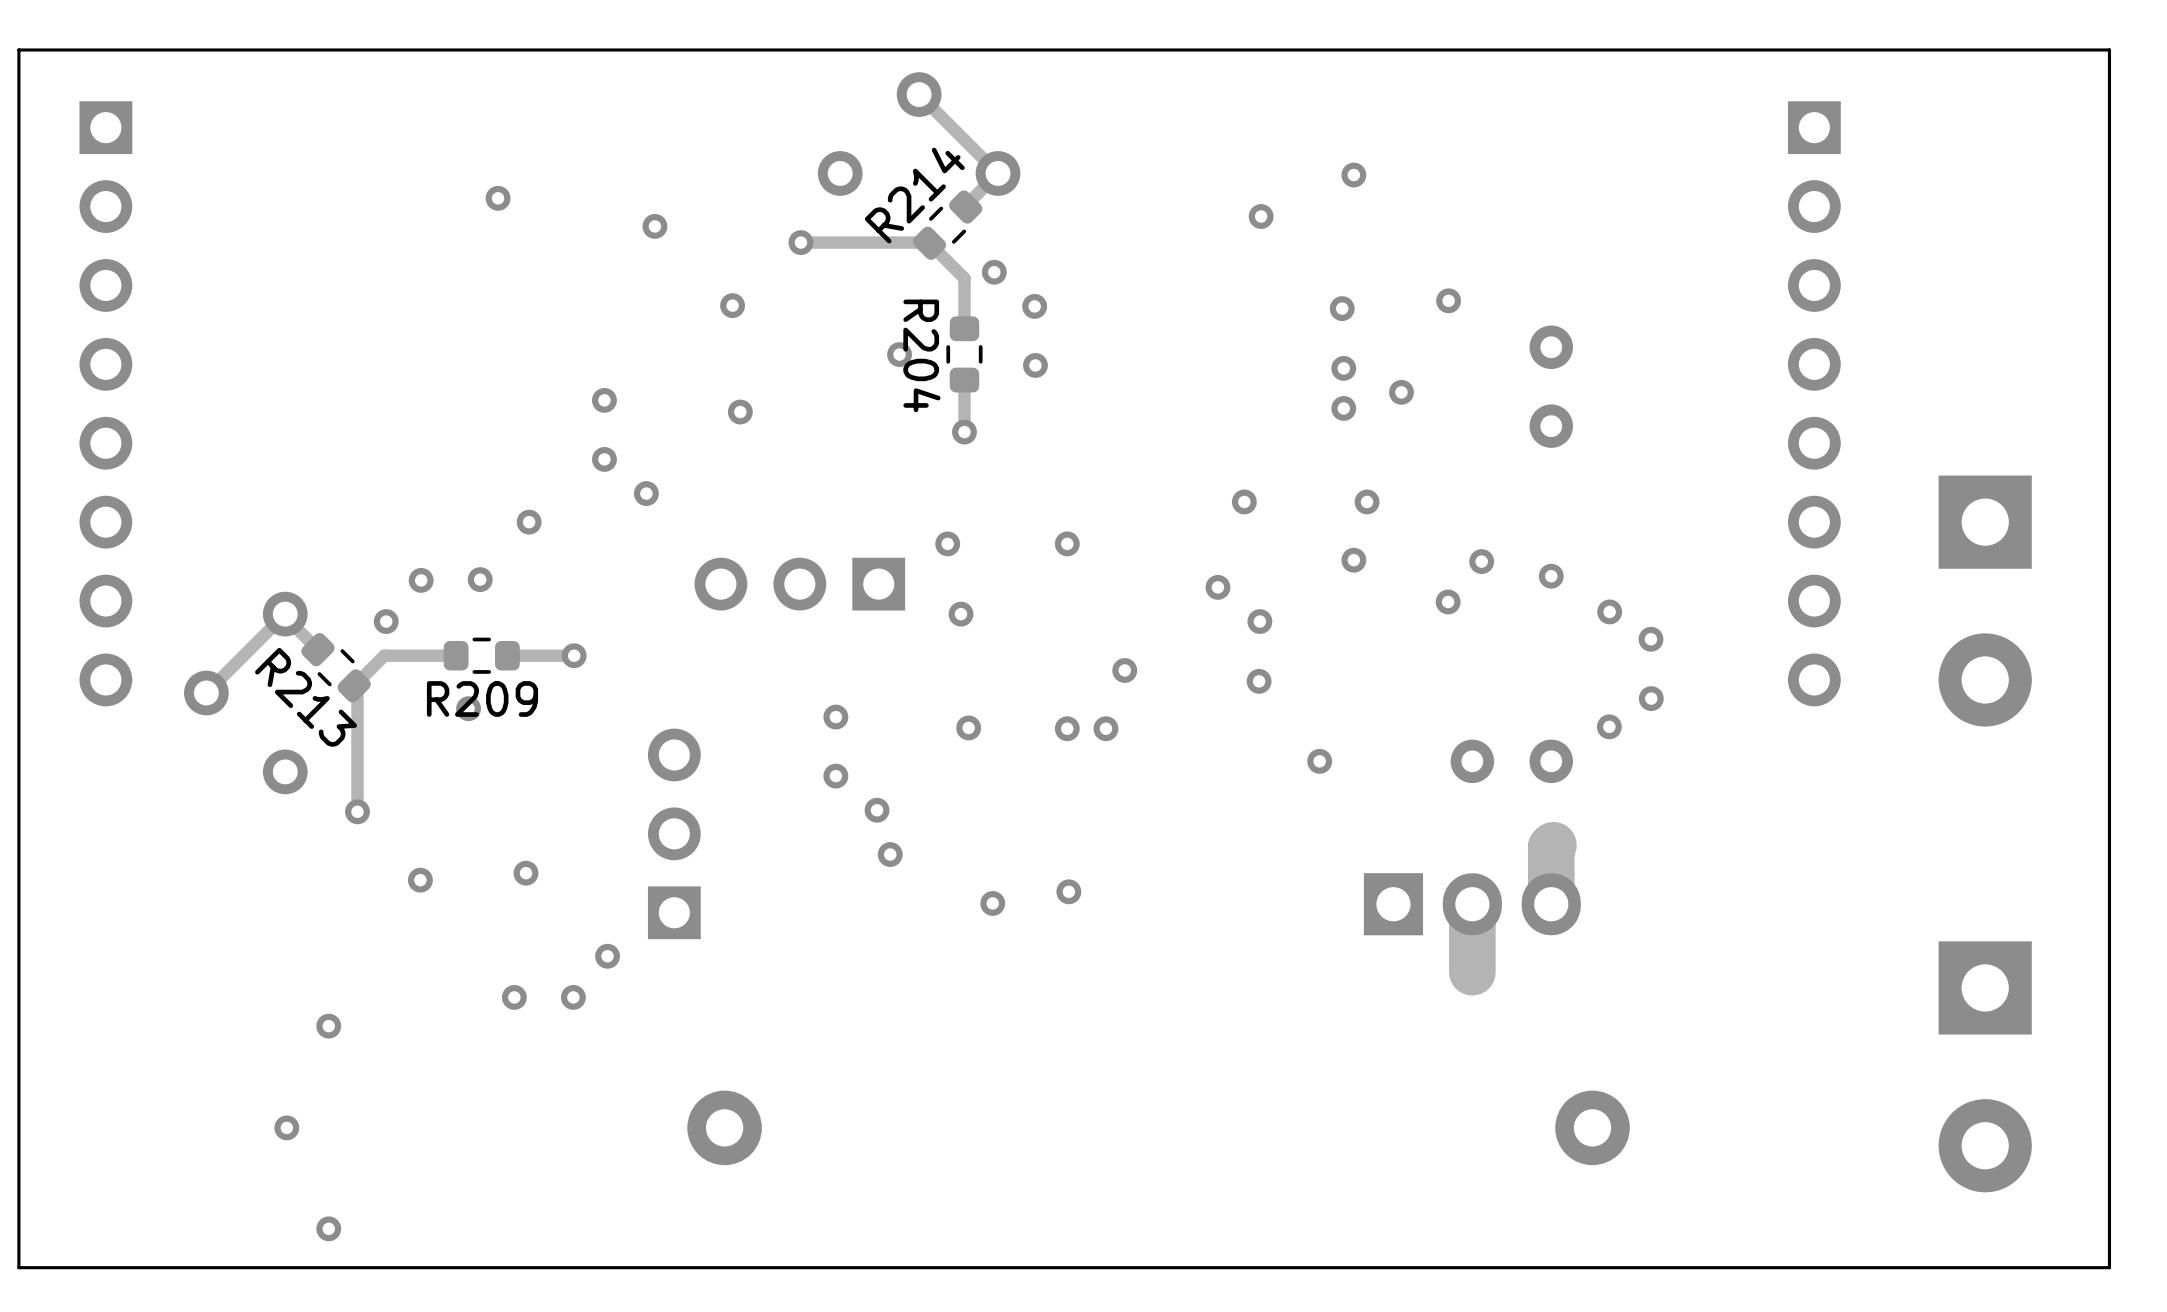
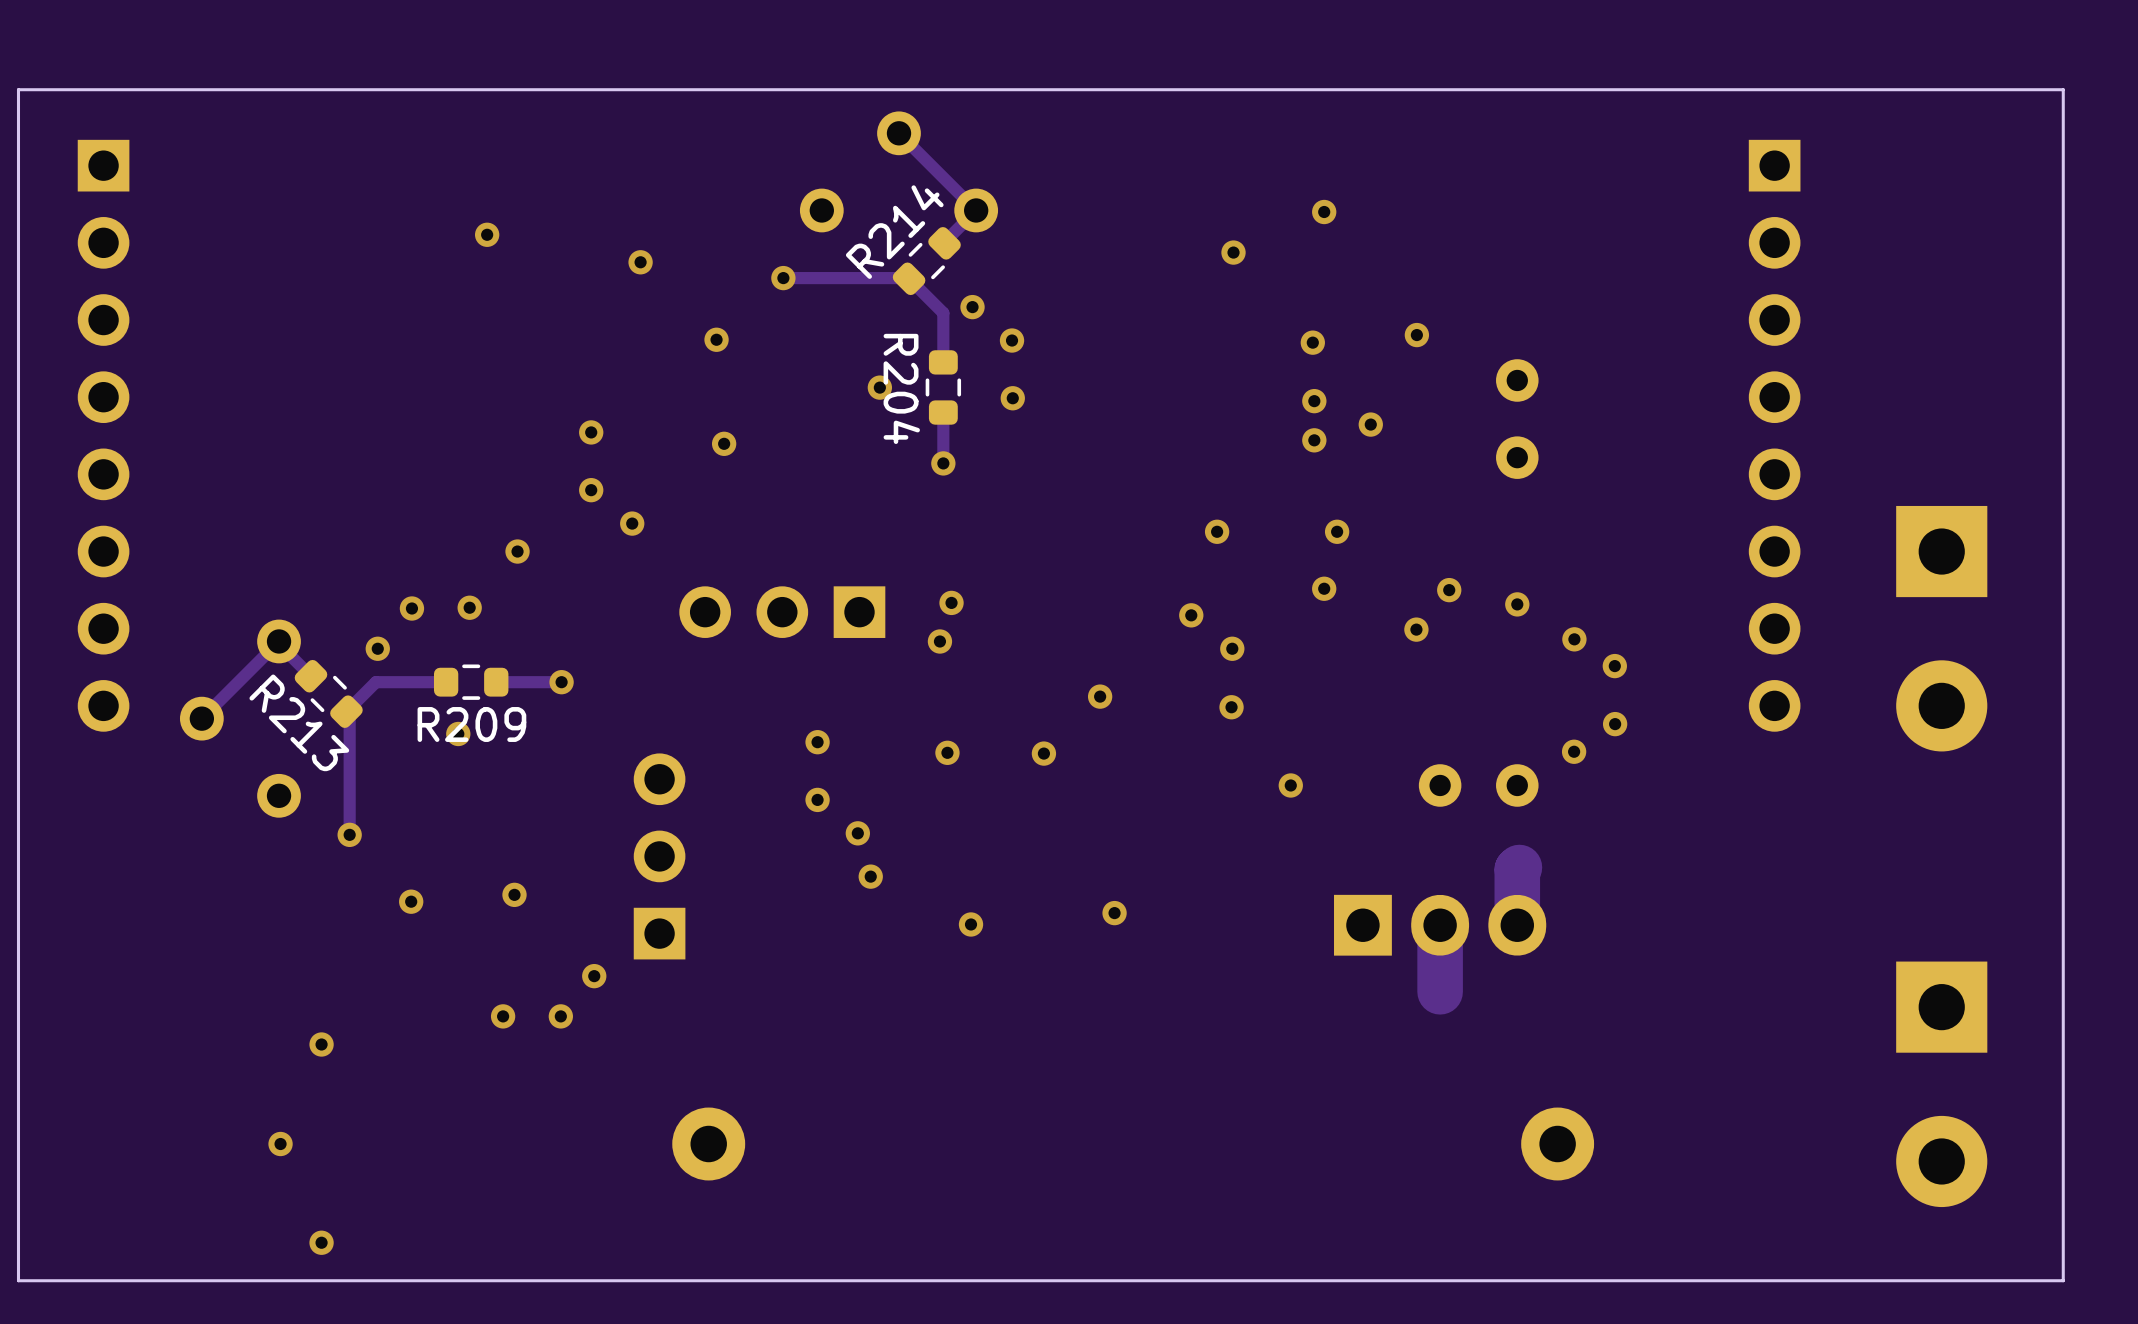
via position: (947, 543) -> (951, 602)
via: (1067, 543) -> none
via: (1105, 728) -> none
via position: (1068, 891) -> (1114, 913)

